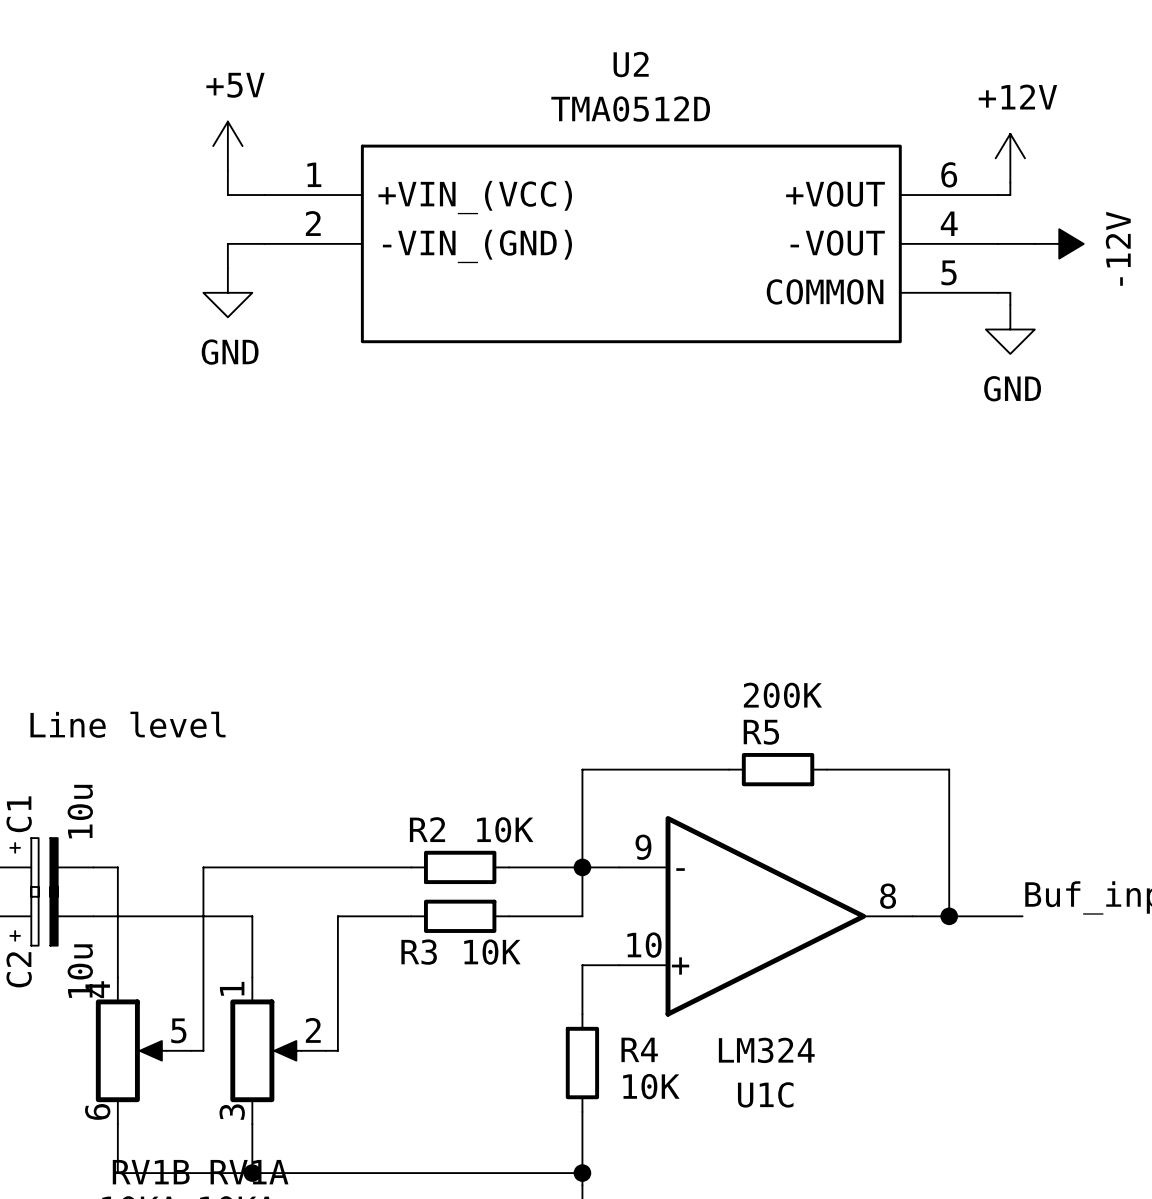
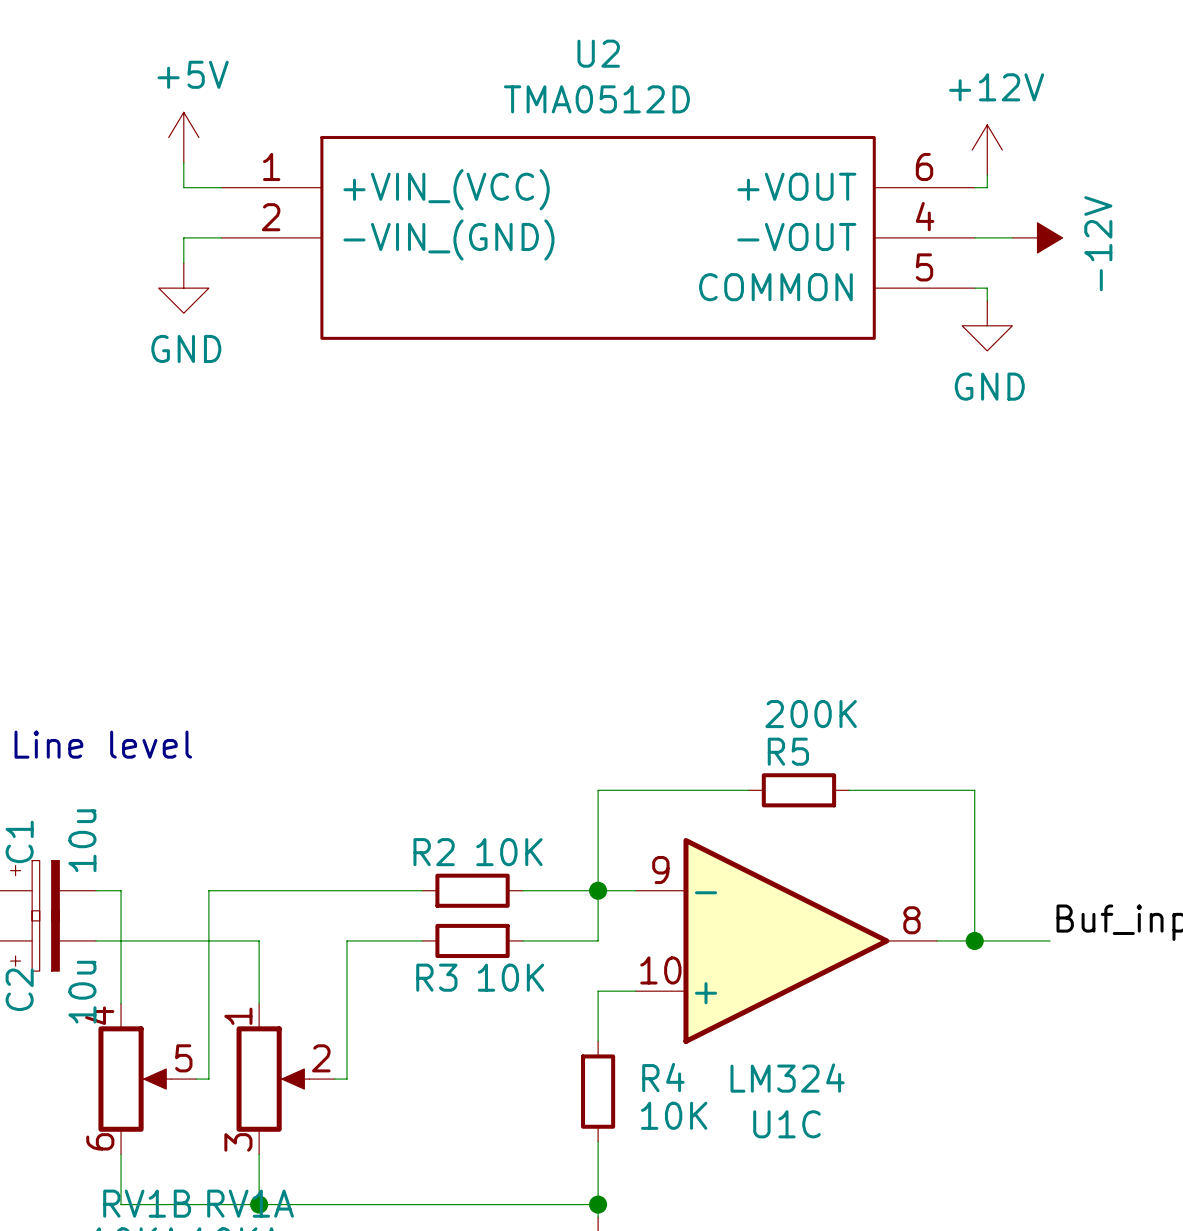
power symbol position: +5V (227, 146) -> +5V (183, 137)
power symbol position: +12V (1010, 158) -> +12V (987, 150)
wire: (227, 170) (227, 195) (264, 195) -> (183, 162) (183, 187) (221, 187)
wire: (1010, 182) (1010, 195) (998, 195) -> (987, 175) (987, 187) (974, 187)
wire: (264, 243) (227, 243) (227, 268) -> (221, 237) (183, 237) (183, 263)
U2 position: (631, 243) -> (598, 237)
wire: (998, 243) (1034, 243) -> (974, 237) (1012, 237)
power symbol position: -12V (1059, 243) -> -12V (1037, 237)
power symbol position: GND (227, 292) -> GND (183, 288)
wire: (998, 292) (1010, 292) (1010, 305) -> (974, 288) (987, 288) (987, 300)
power symbol position: GND (1010, 329) -> GND (987, 325)

